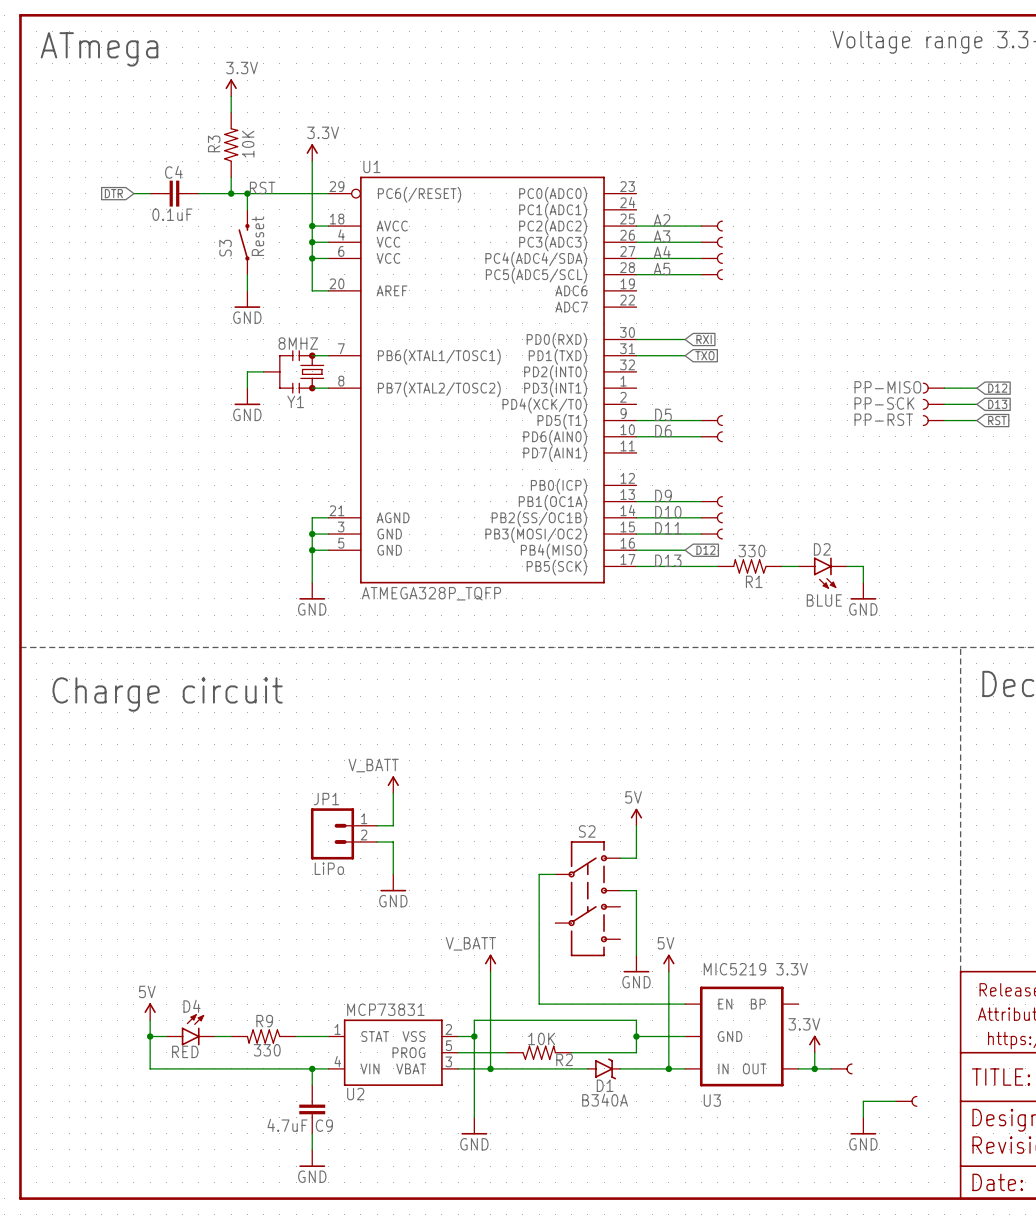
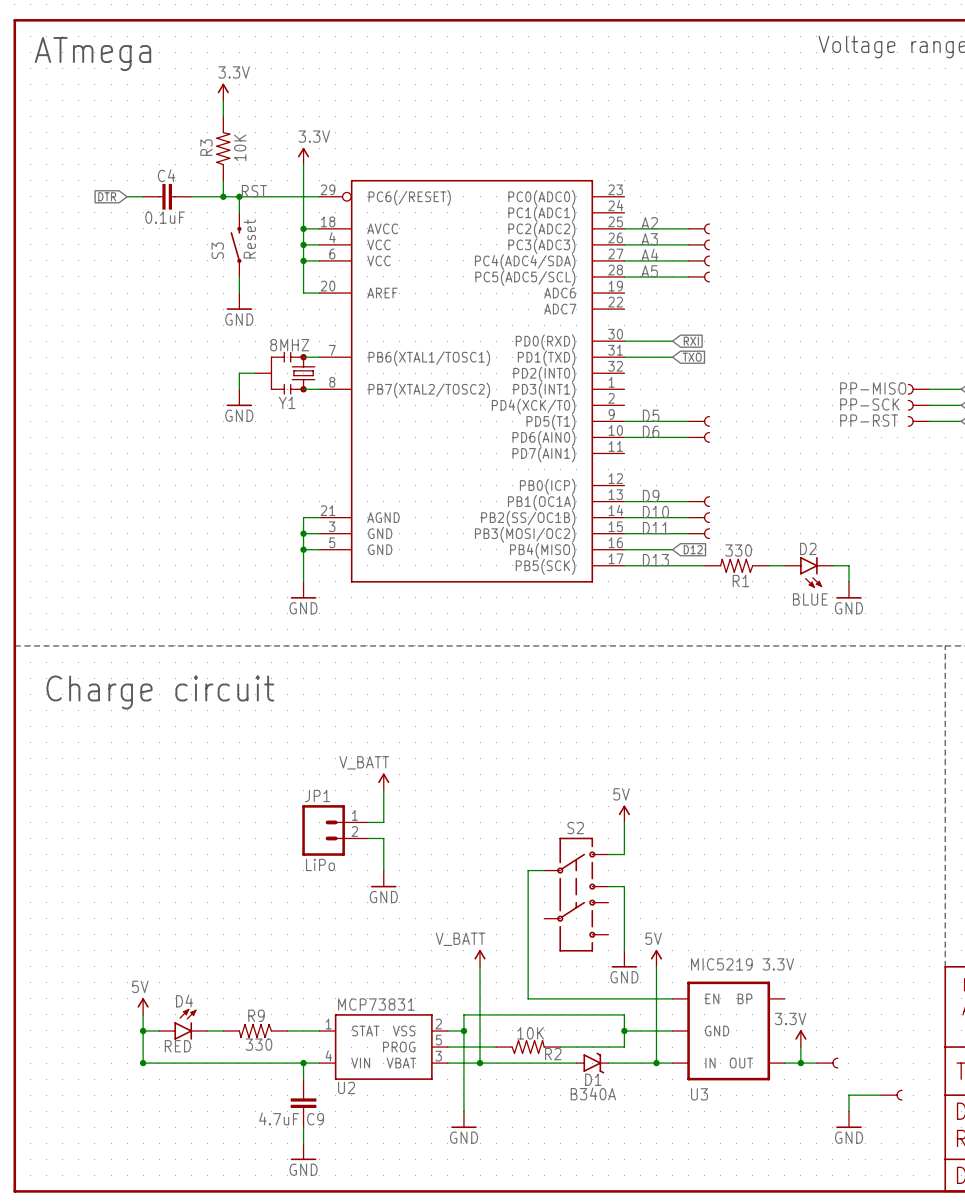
U1 name: U1 (371, 166) -> none
U1 value: ATMEGA328P_TQFP (431, 593) -> none
junction: none -> (143, 1063)

